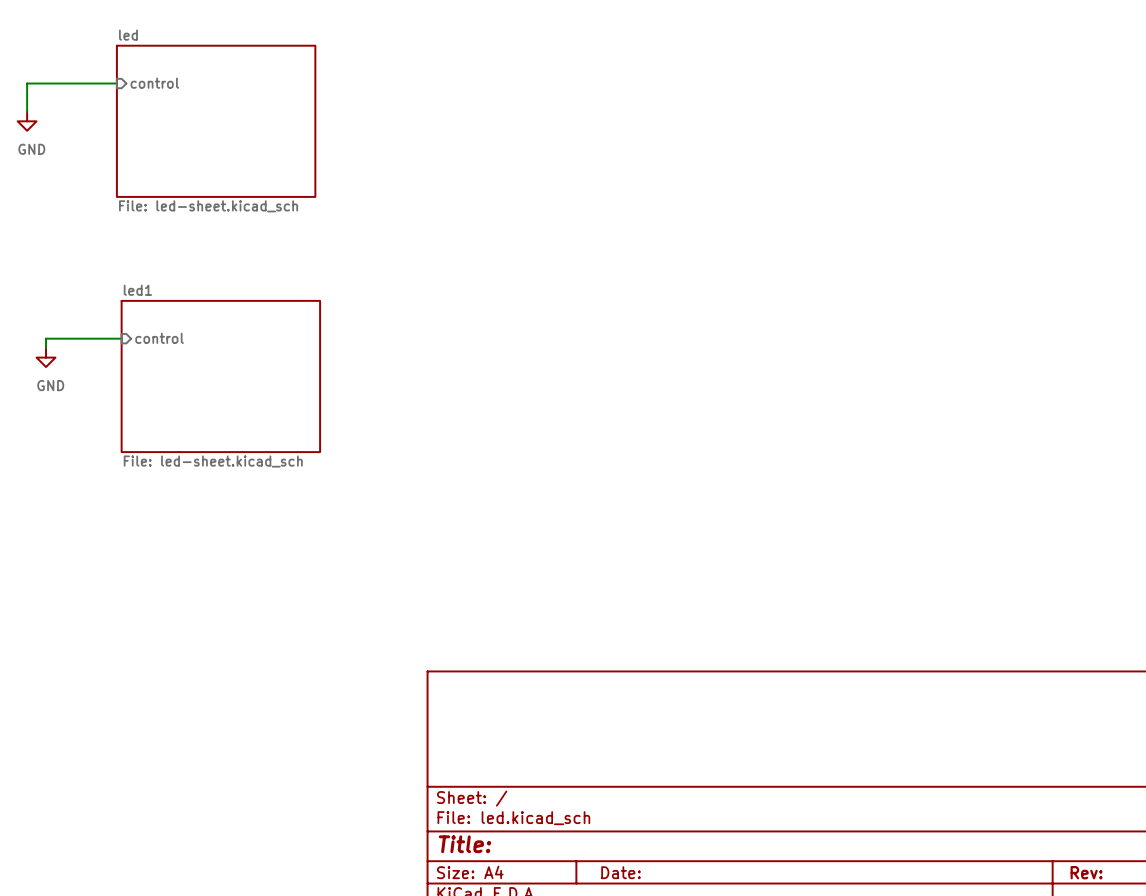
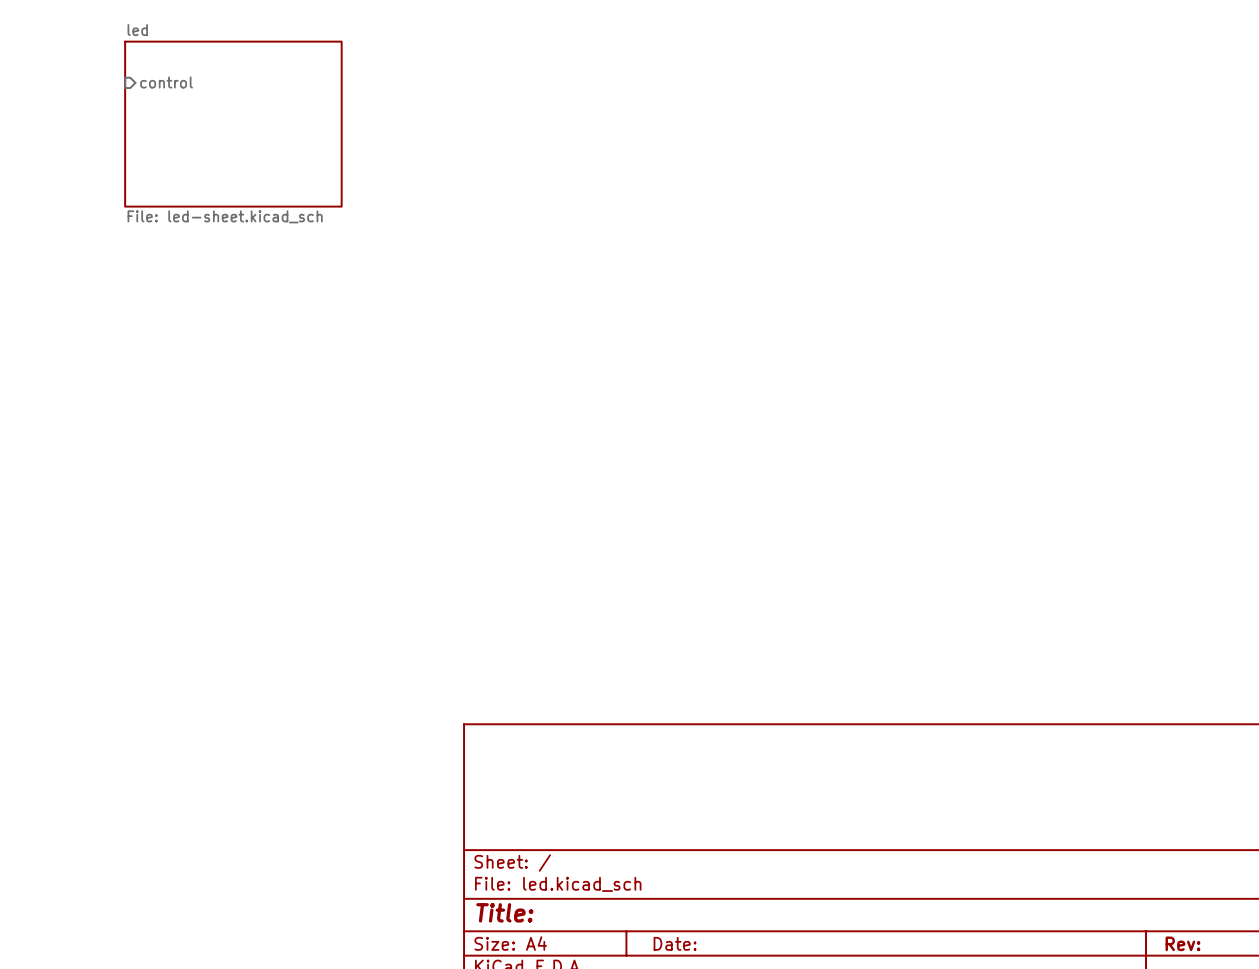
wire: (116, 83) (27, 83) (27, 111) -> none
power symbol: GND (27, 121) -> none
wire: (121, 338) (46, 338) (46, 348) -> none
sheet pin: control (159, 338) -> none
power symbol: GND (46, 357) -> none
sheet led1: File: led-sheet.kicad_sch (220, 376) -> none

